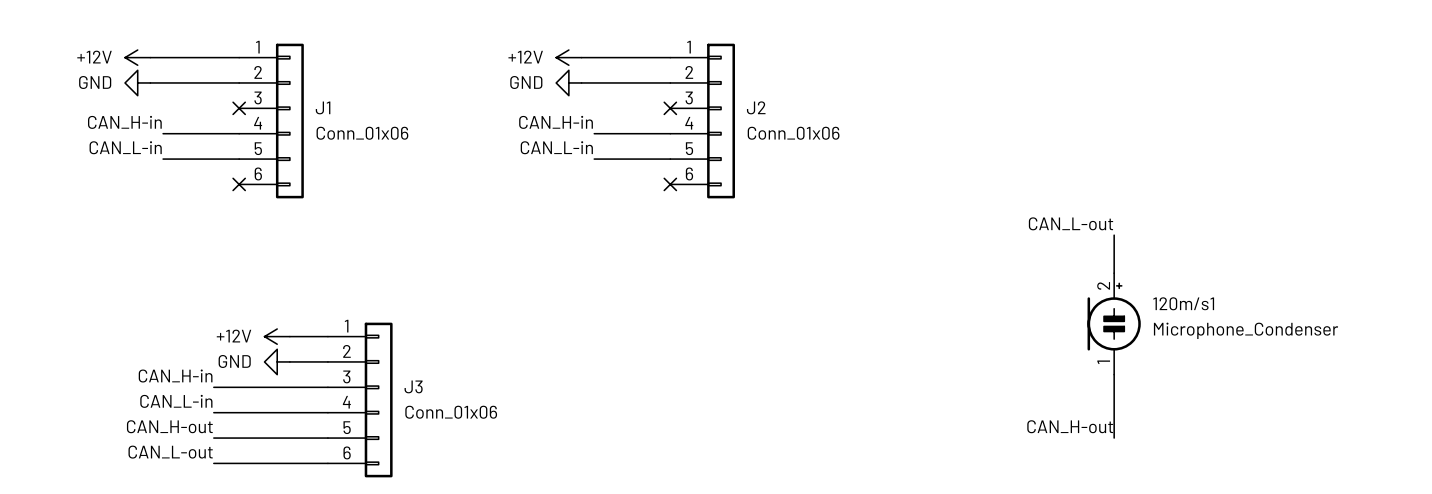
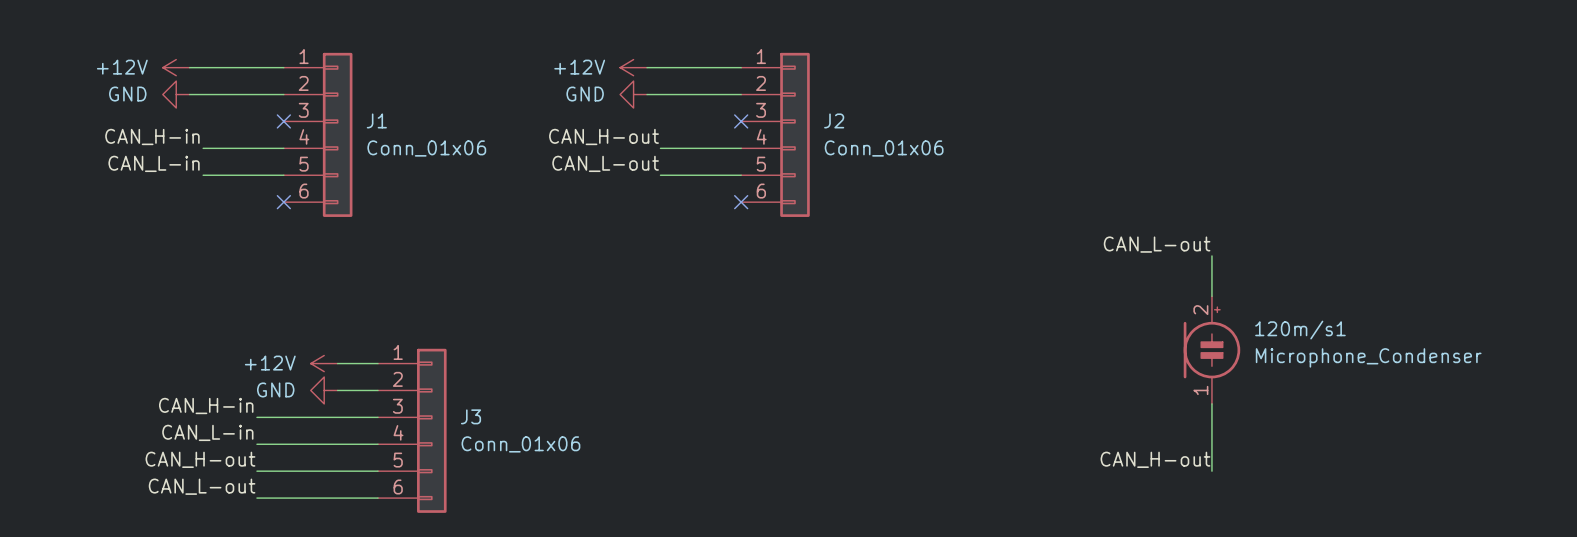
label: CAN_H-in (556, 122) -> CAN_H-out (604, 136)
label: CAN_L-in (556, 147) -> CAN_L-out (605, 163)

